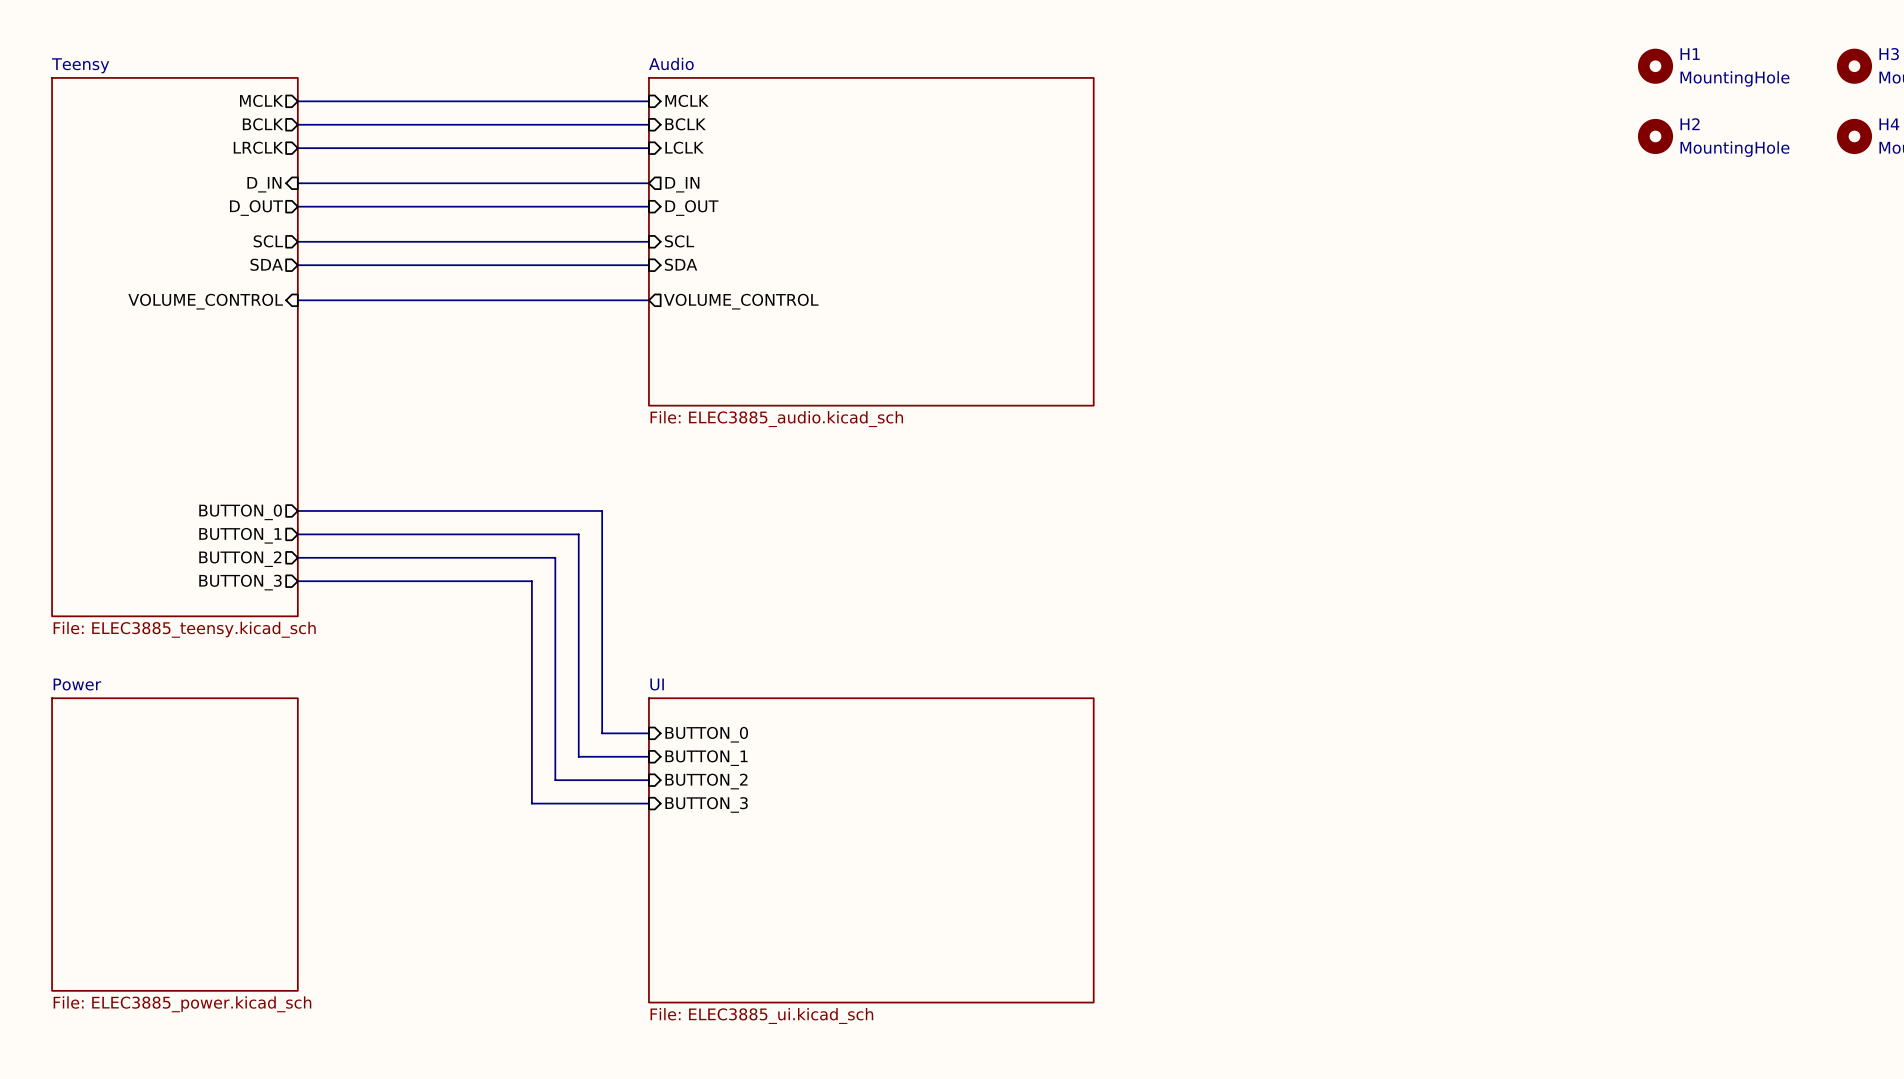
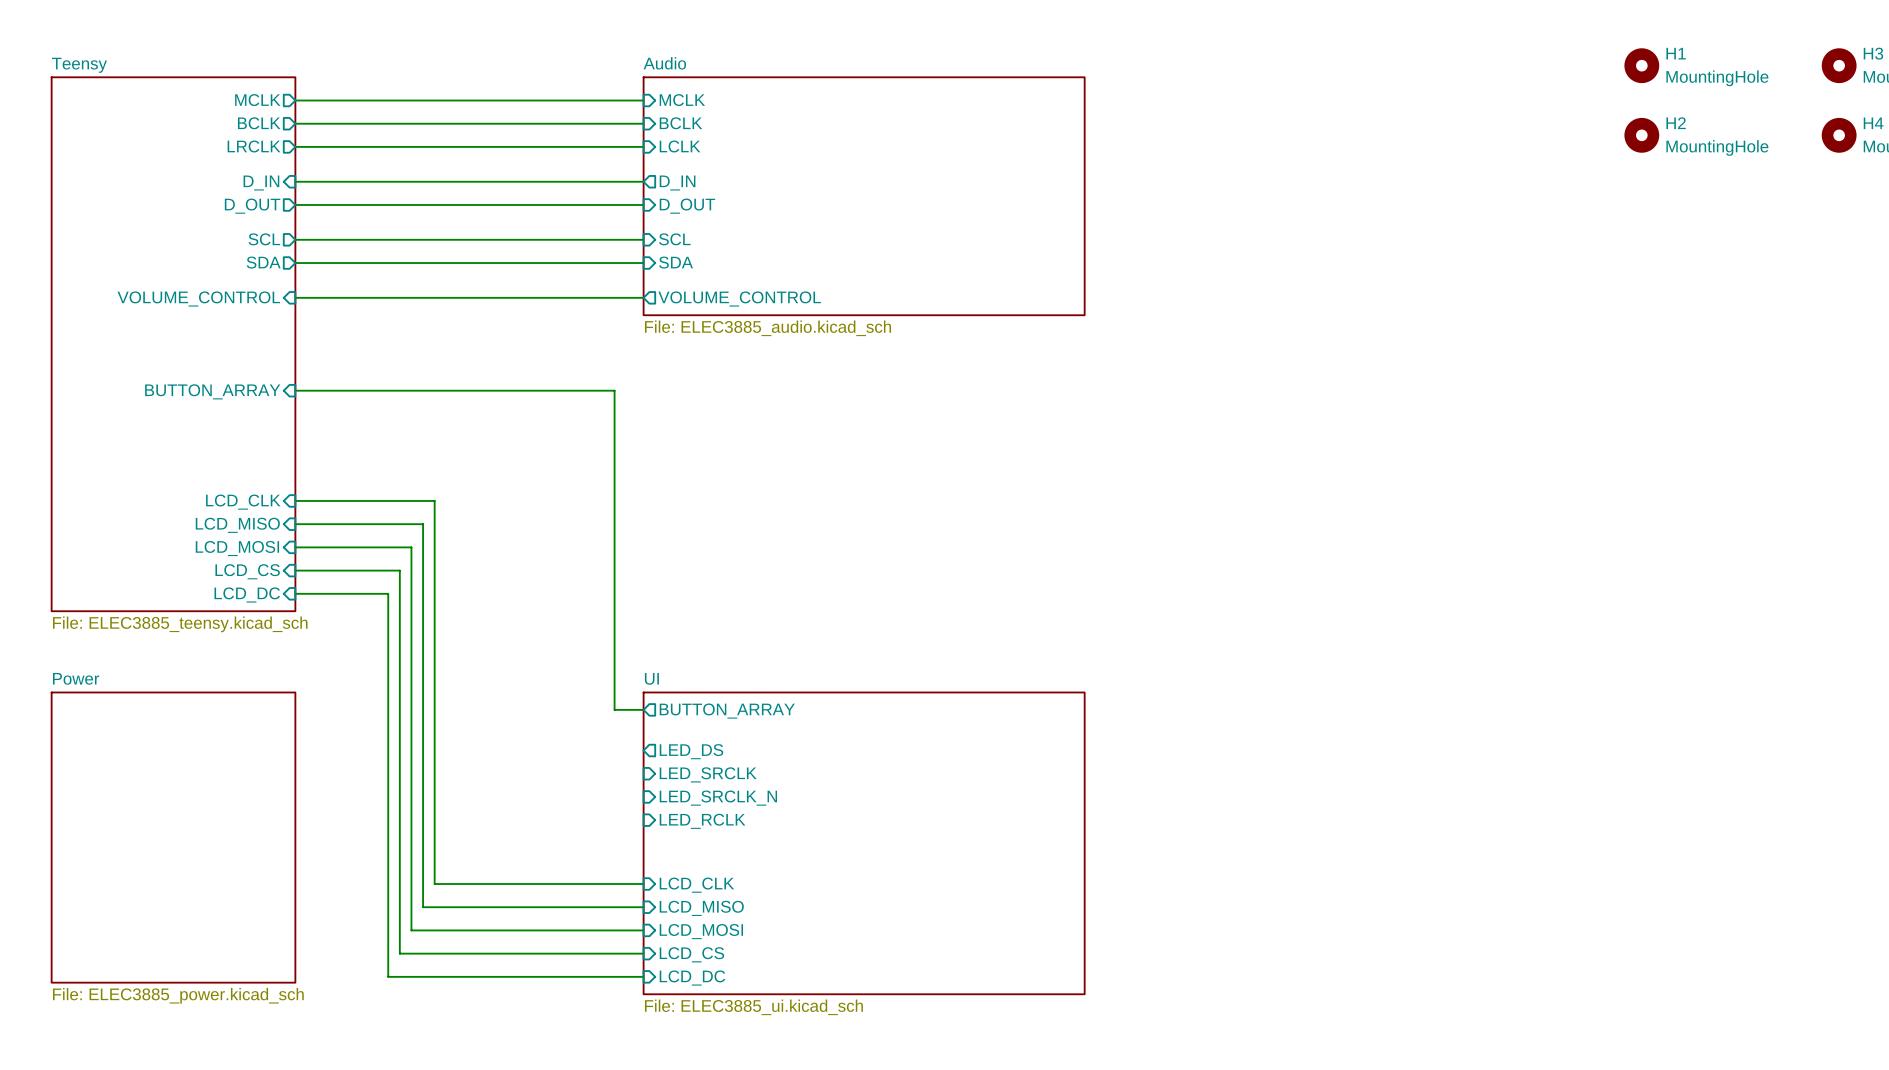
sheet Audio: none -> File: ELEC3885_audio.kicad_sch (864, 196)
sheet Audio: File: ELEC3885_audio.kicad_sch (871, 241) -> none
wire: none -> (295, 390) (614, 390) (614, 709) (643, 709)
sheet pin: none -> BUTTON_ARRAY (212, 391)
wire: none -> (295, 500) (434, 500) (434, 884) (643, 884)
wire: (297, 510) (602, 510) (602, 733) (648, 733) -> none
sheet pin shape: output (240, 512) -> input (243, 502)
sheet pin: BUTTON_0 (240, 512) -> LCD_CLK (243, 502)
wire: none -> (295, 524) (423, 524) (423, 907) (643, 907)
wire: (297, 534) (578, 534) (578, 756) (648, 756) -> none
sheet pin shape: output (240, 535) -> input (237, 525)
sheet pin: BUTTON_1 (240, 535) -> LCD_MISO (237, 525)
wire: none -> (295, 547) (411, 547) (411, 930) (643, 930)
wire: (297, 557) (555, 557) (555, 780) (648, 780) -> none
sheet pin shape: output (240, 559) -> input (237, 548)
sheet pin: BUTTON_2 (240, 559) -> LCD_MOSI (237, 548)
wire: none -> (295, 570) (399, 570) (399, 953) (643, 953)
wire: (297, 581) (531, 581) (531, 803) (648, 803) -> none
sheet pin shape: output (240, 582) -> input (247, 571)
sheet pin: BUTTON_3 (240, 582) -> LCD_CS (247, 571)
wire: none -> (295, 593) (388, 593) (388, 976) (643, 976)
sheet pin: none -> LCD_DC (247, 594)
sheet pin shape: input (706, 734) -> output (727, 711)
sheet pin: BUTTON_0 (706, 734) -> BUTTON_ARRAY (727, 711)
sheet pin shape: input (706, 758) -> output (691, 751)
sheet pin: BUTTON_1 (706, 758) -> LED_DS (691, 751)
sheet pin: BUTTON_2 (706, 781) -> LED_SRCLK (708, 774)
sheet pin: BUTTON_3 (706, 804) -> LED_SRCLK_N (718, 798)
sheet pin: none -> LED_RCLK (702, 821)
sheet pin: none -> LCD_CLK (696, 885)
sheet pin: none -> LCD_MISO (701, 908)
sheet pin: none -> LCD_MOSI (701, 931)
sheet pin: none -> LCD_CS (691, 954)
sheet pin: none -> LCD_DC (692, 978)

